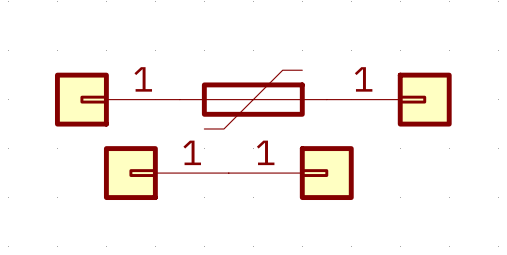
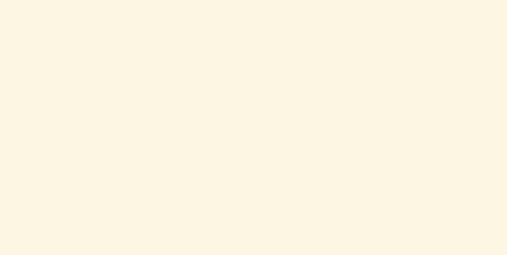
part: (117, 99) -> none
part: (253, 99) -> none
part: (389, 99) -> none
part: (166, 173) -> none
part: (291, 173) -> none

